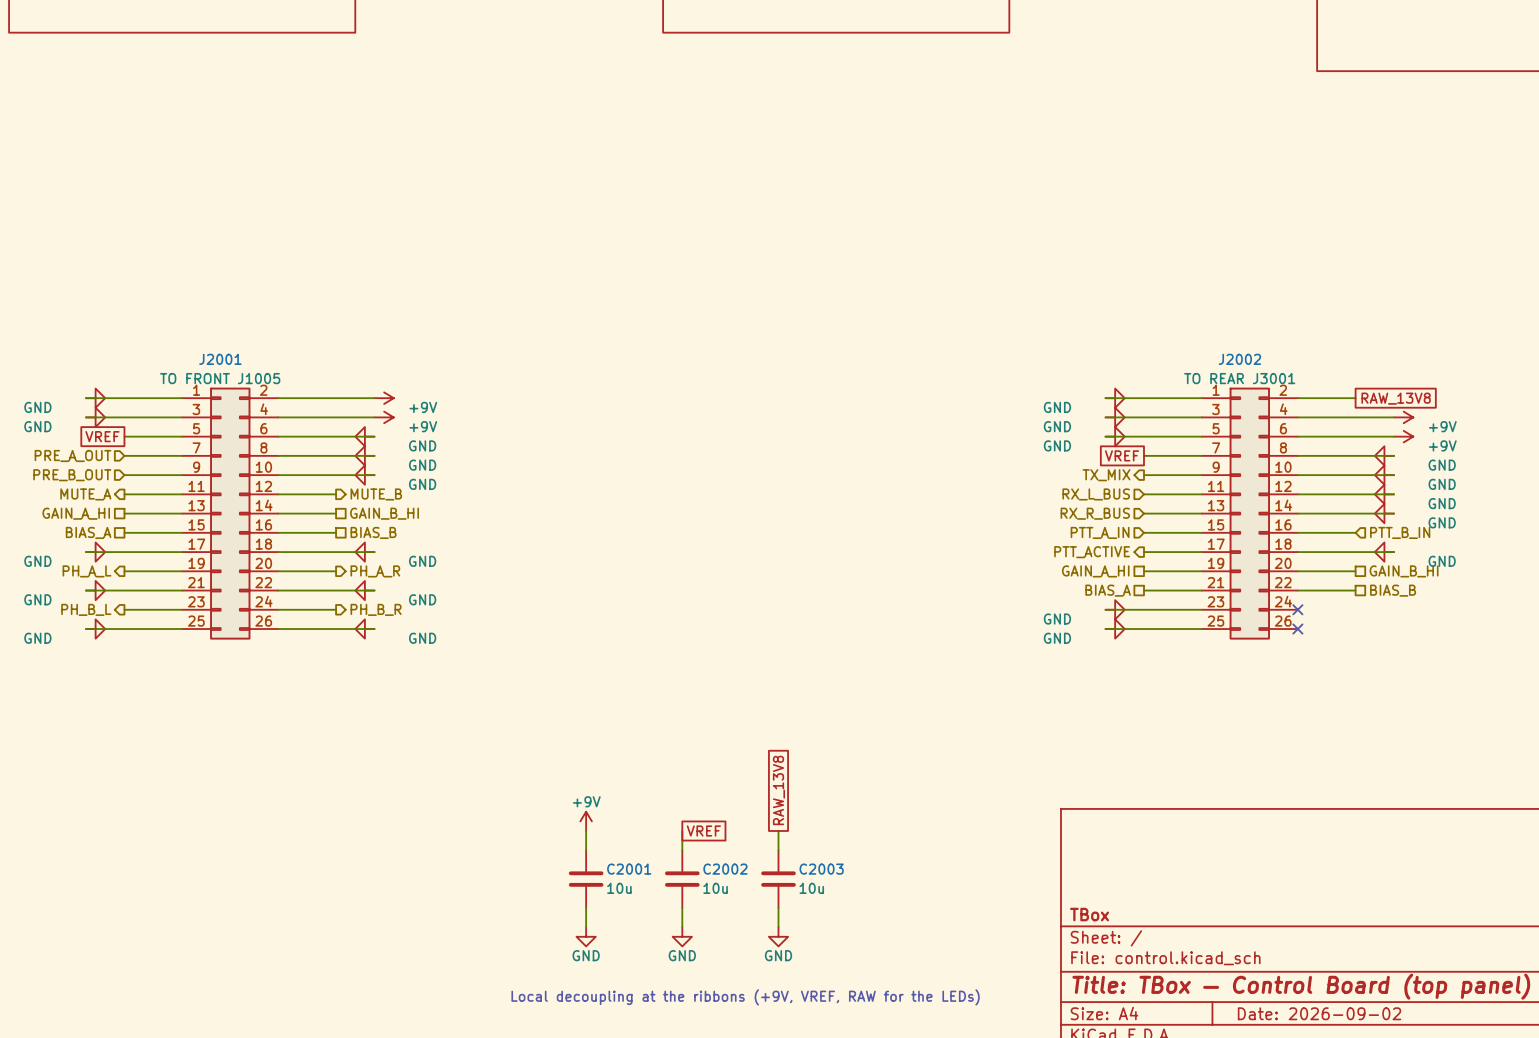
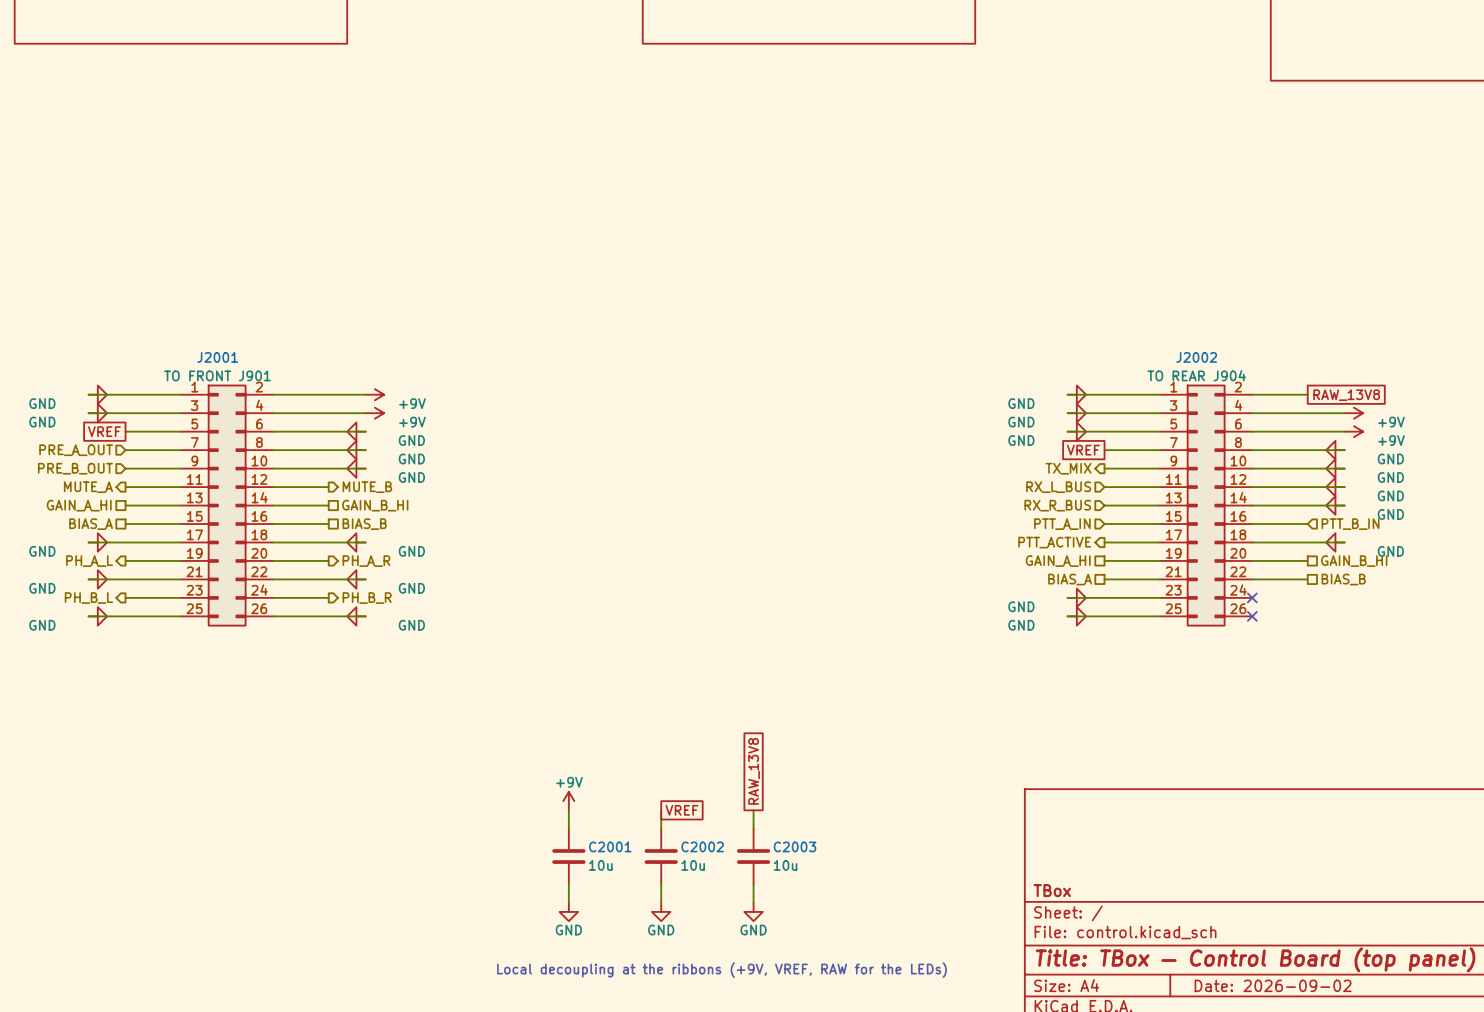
J2001 value: TO FRONT J1005 (220, 378) -> TO FRONT J901 (217, 375)
J2002 value: TO REAR J3001 (1239, 378) -> TO REAR J904 (1196, 375)

